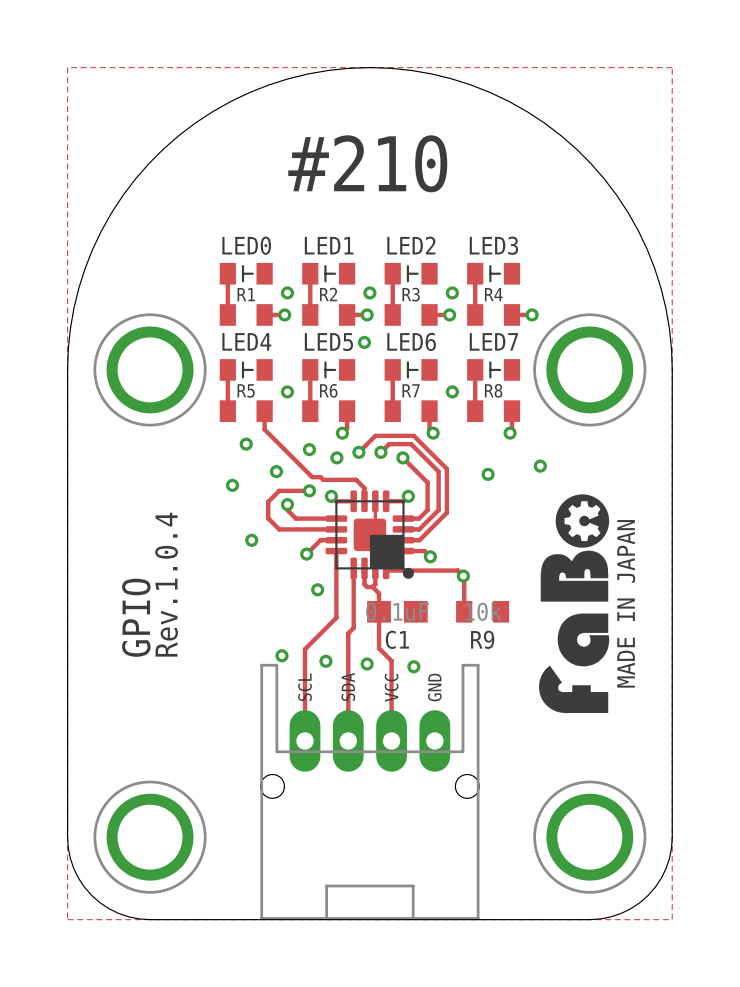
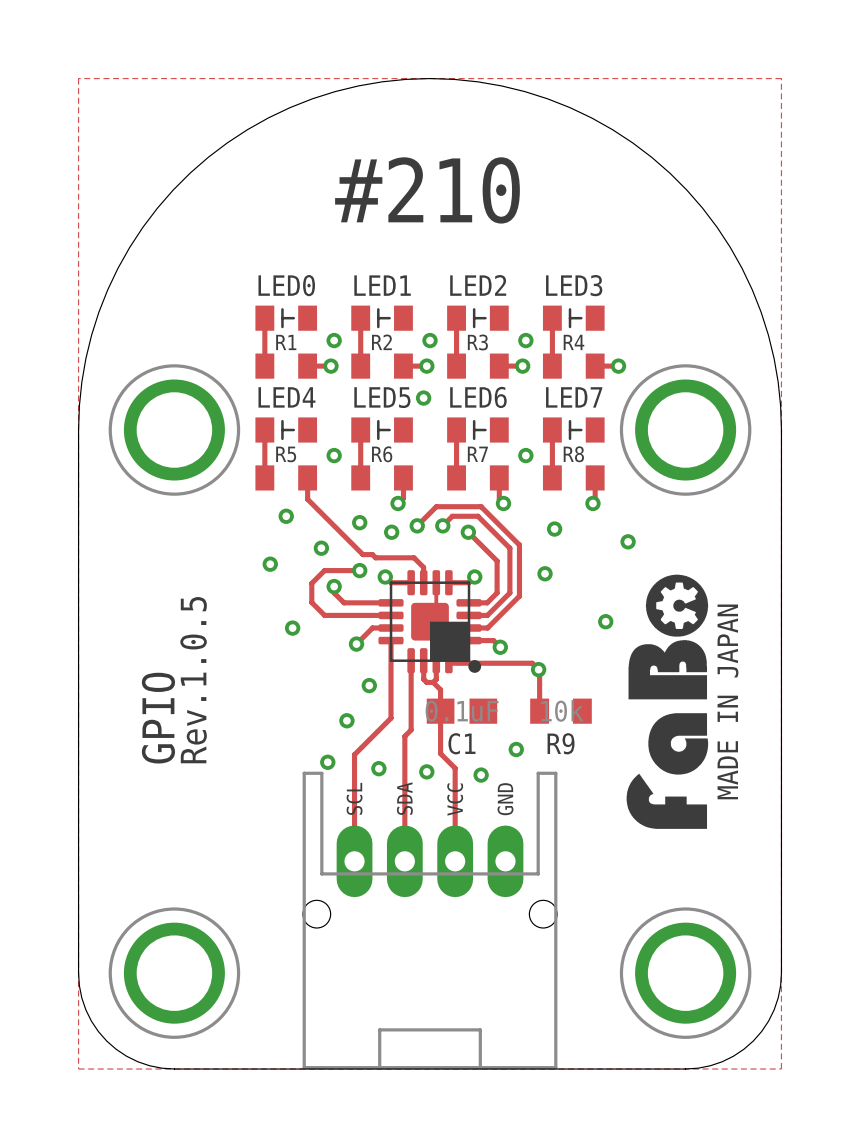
via: none -> (554, 529)
via: (488, 474) -> none
via: none -> (545, 573)
via: none -> (605, 621)
text: Rev.1.0.4 (166, 584) -> Rev.1.0.5 (193, 680)
via: none -> (346, 720)
via: none -> (516, 749)

